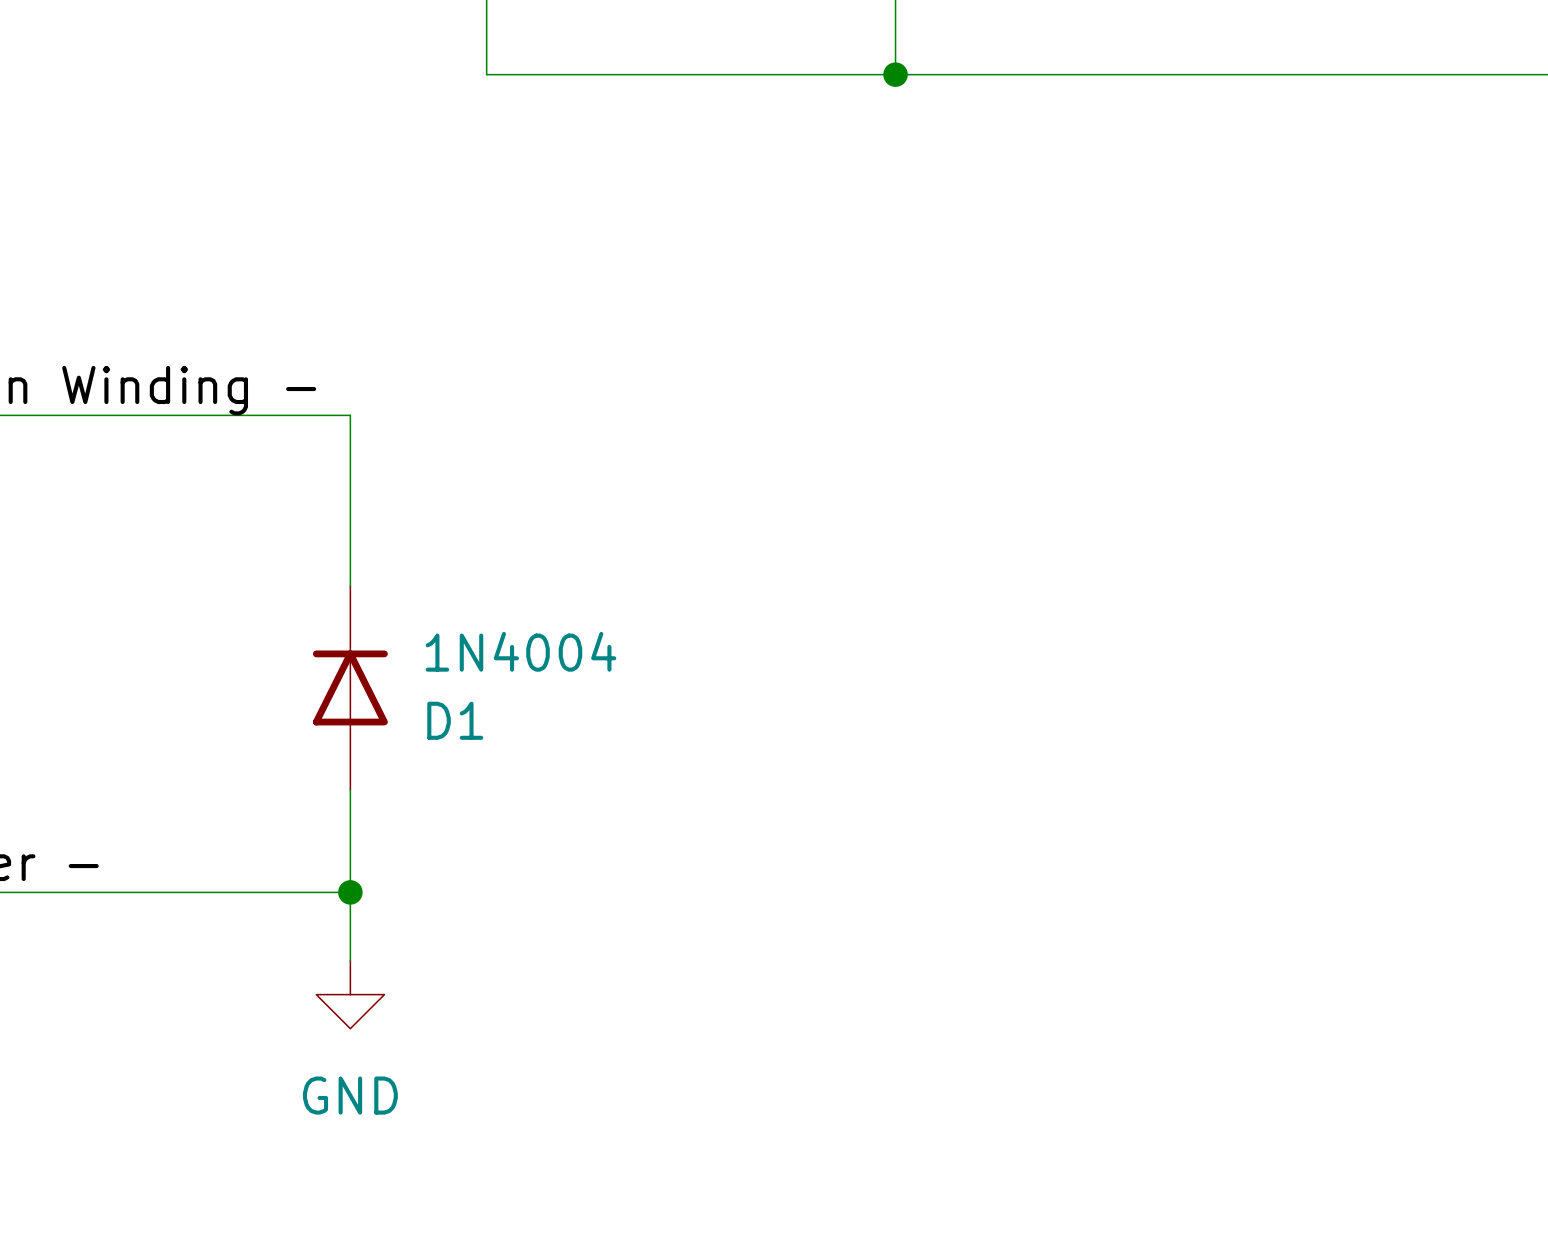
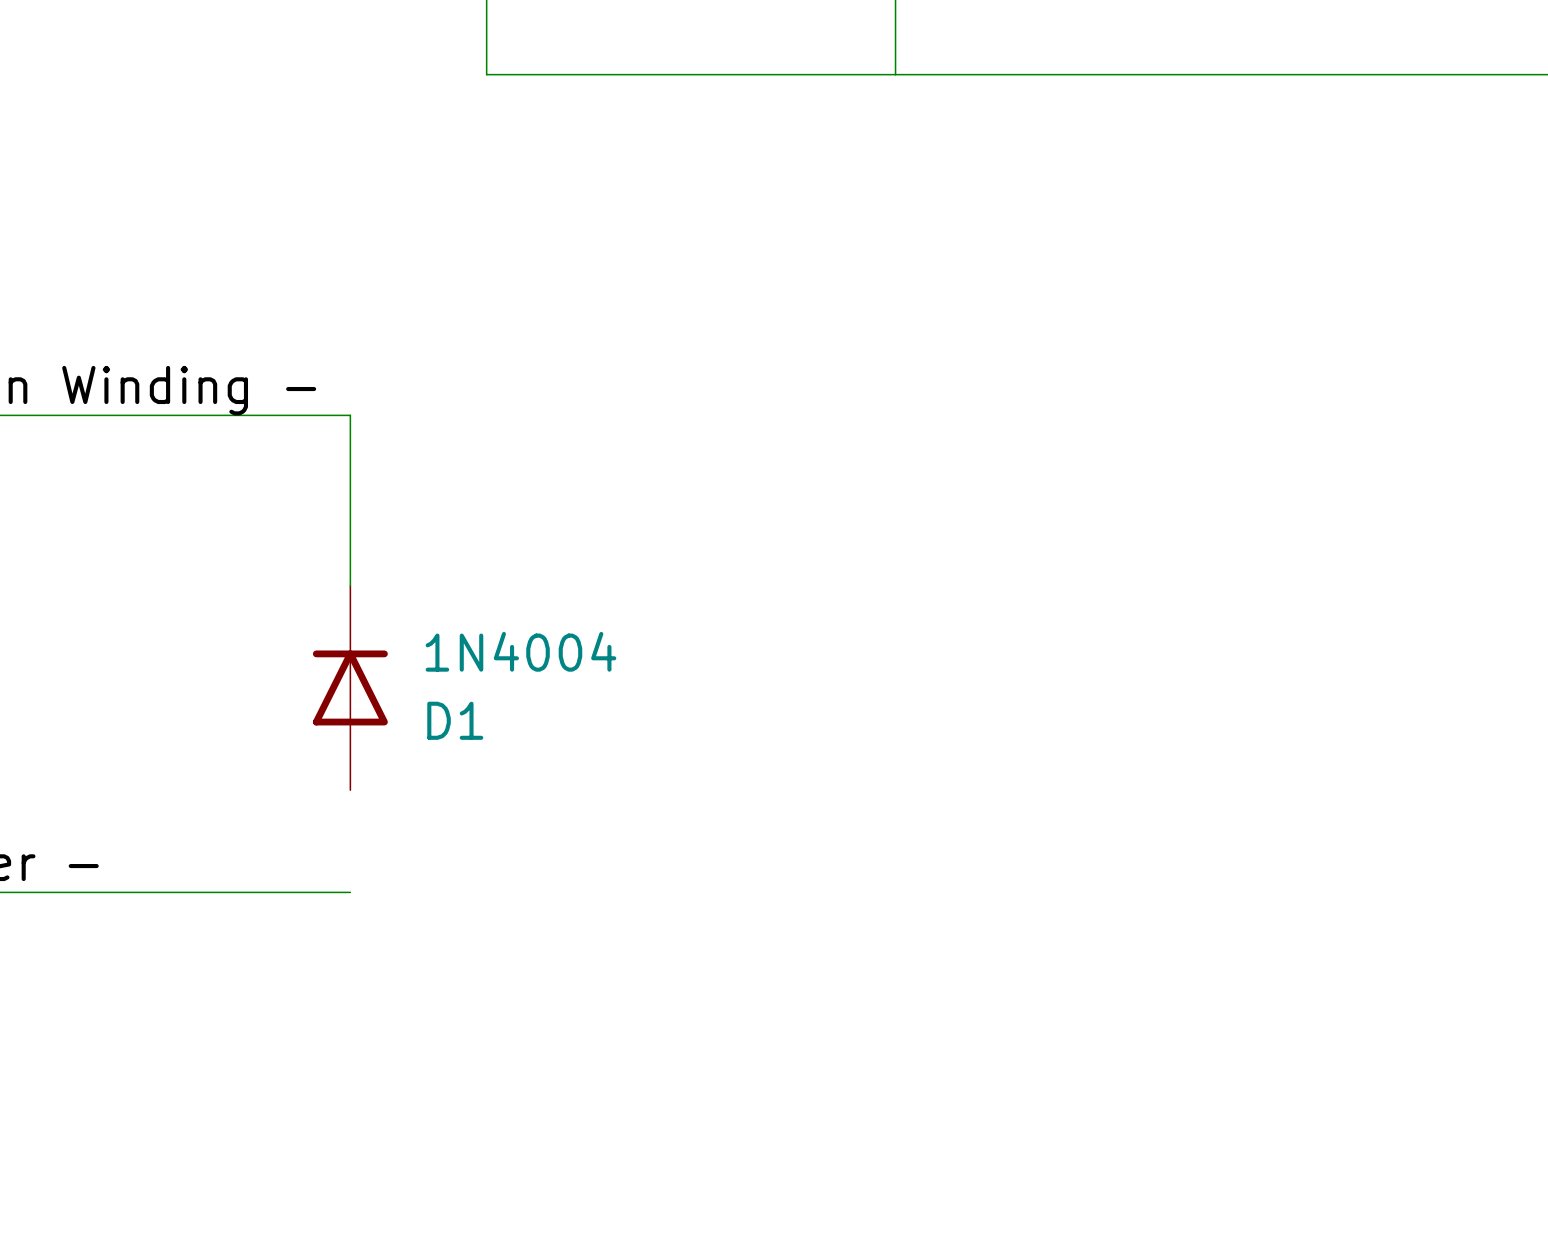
junction: (895, 74) -> none
wire: (350, 790) (350, 960) -> none
junction: (350, 892) -> none
power symbol: GND (350, 994) -> none

